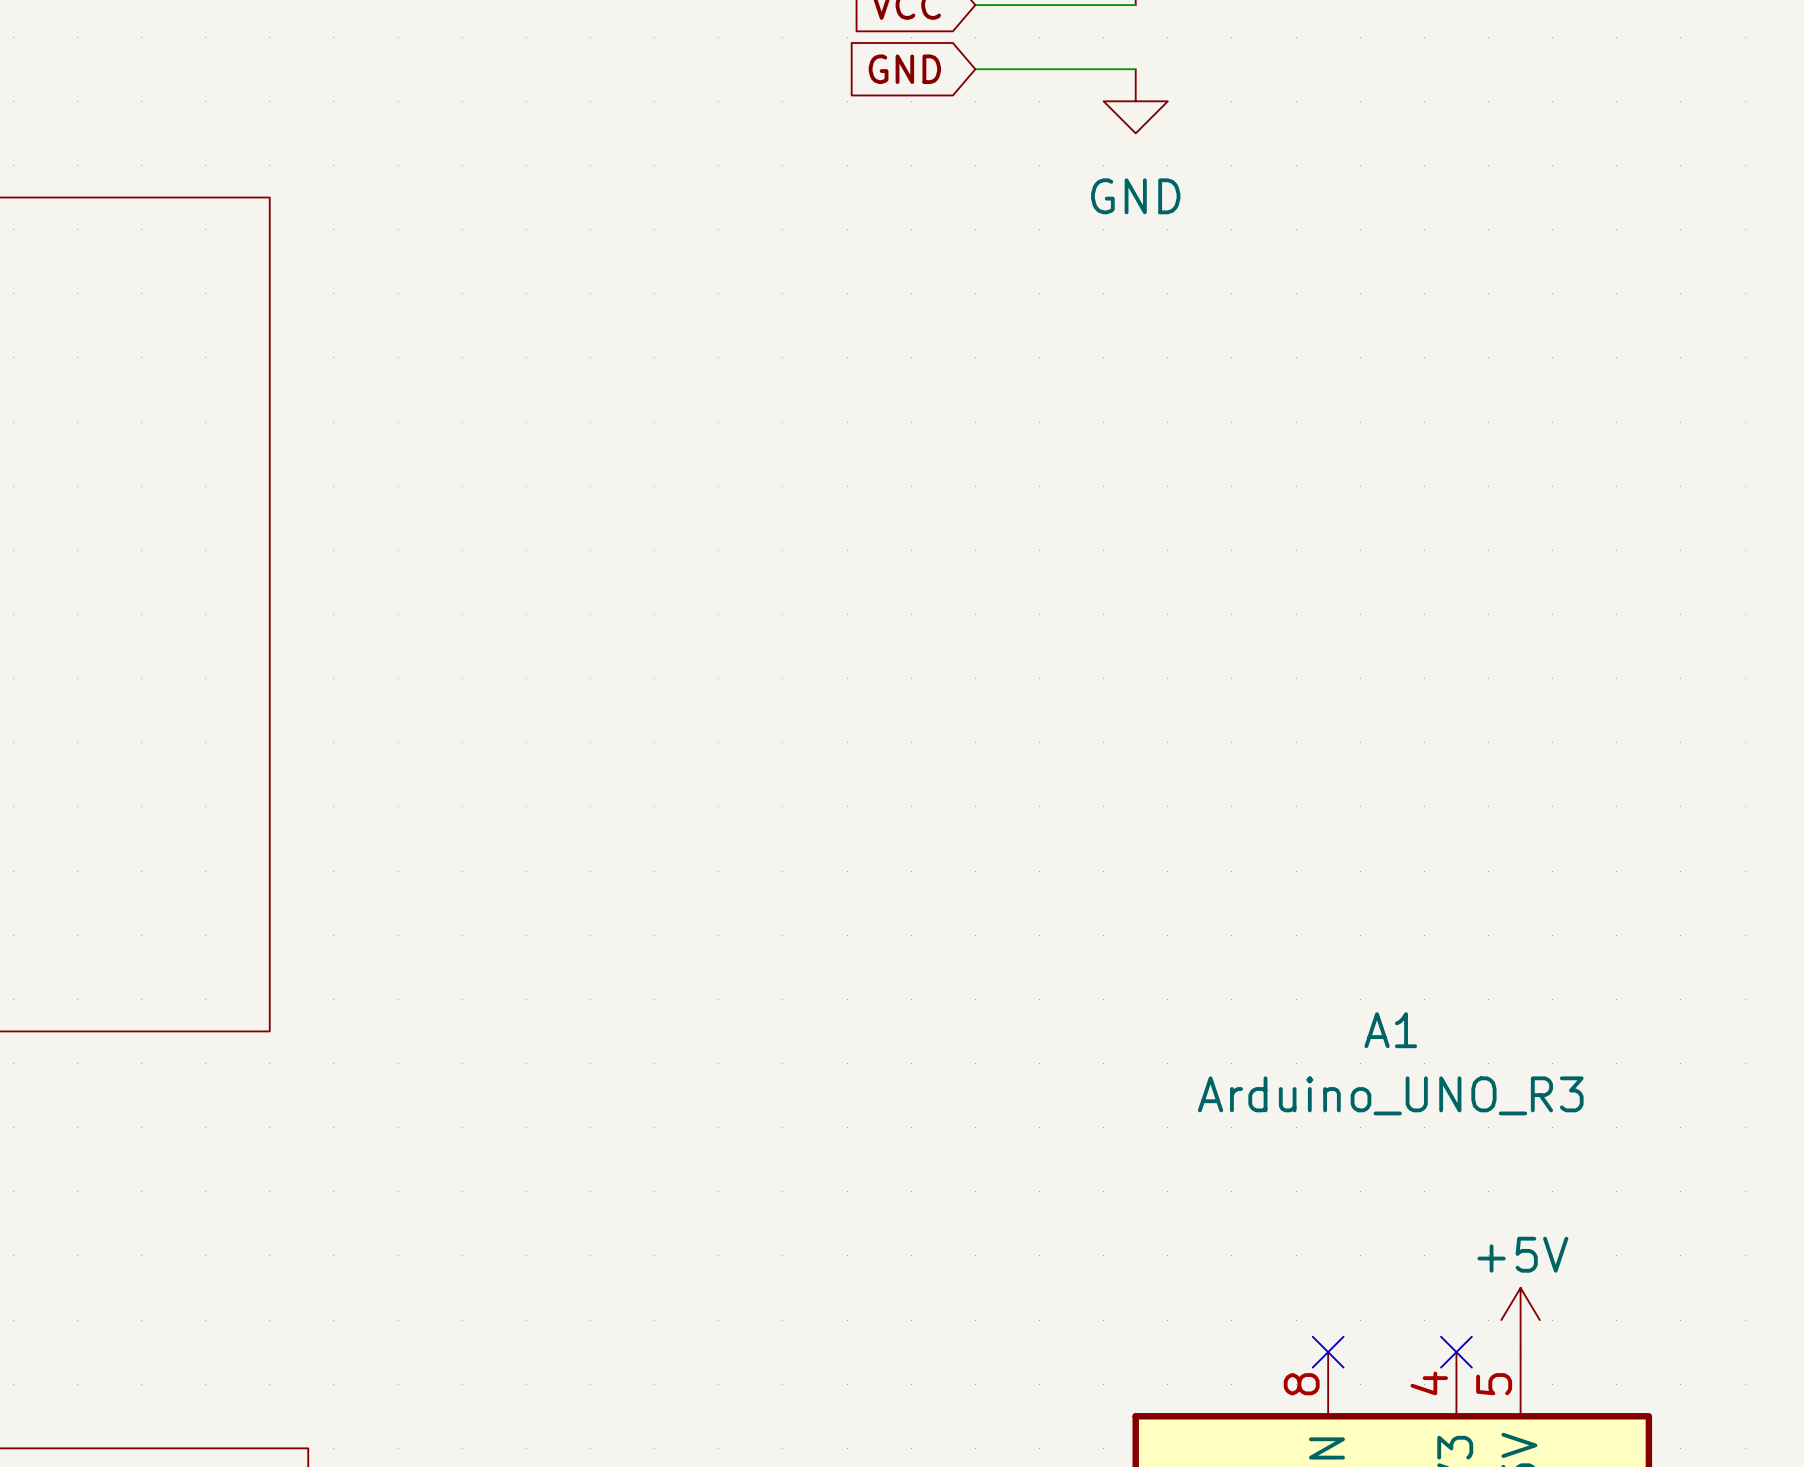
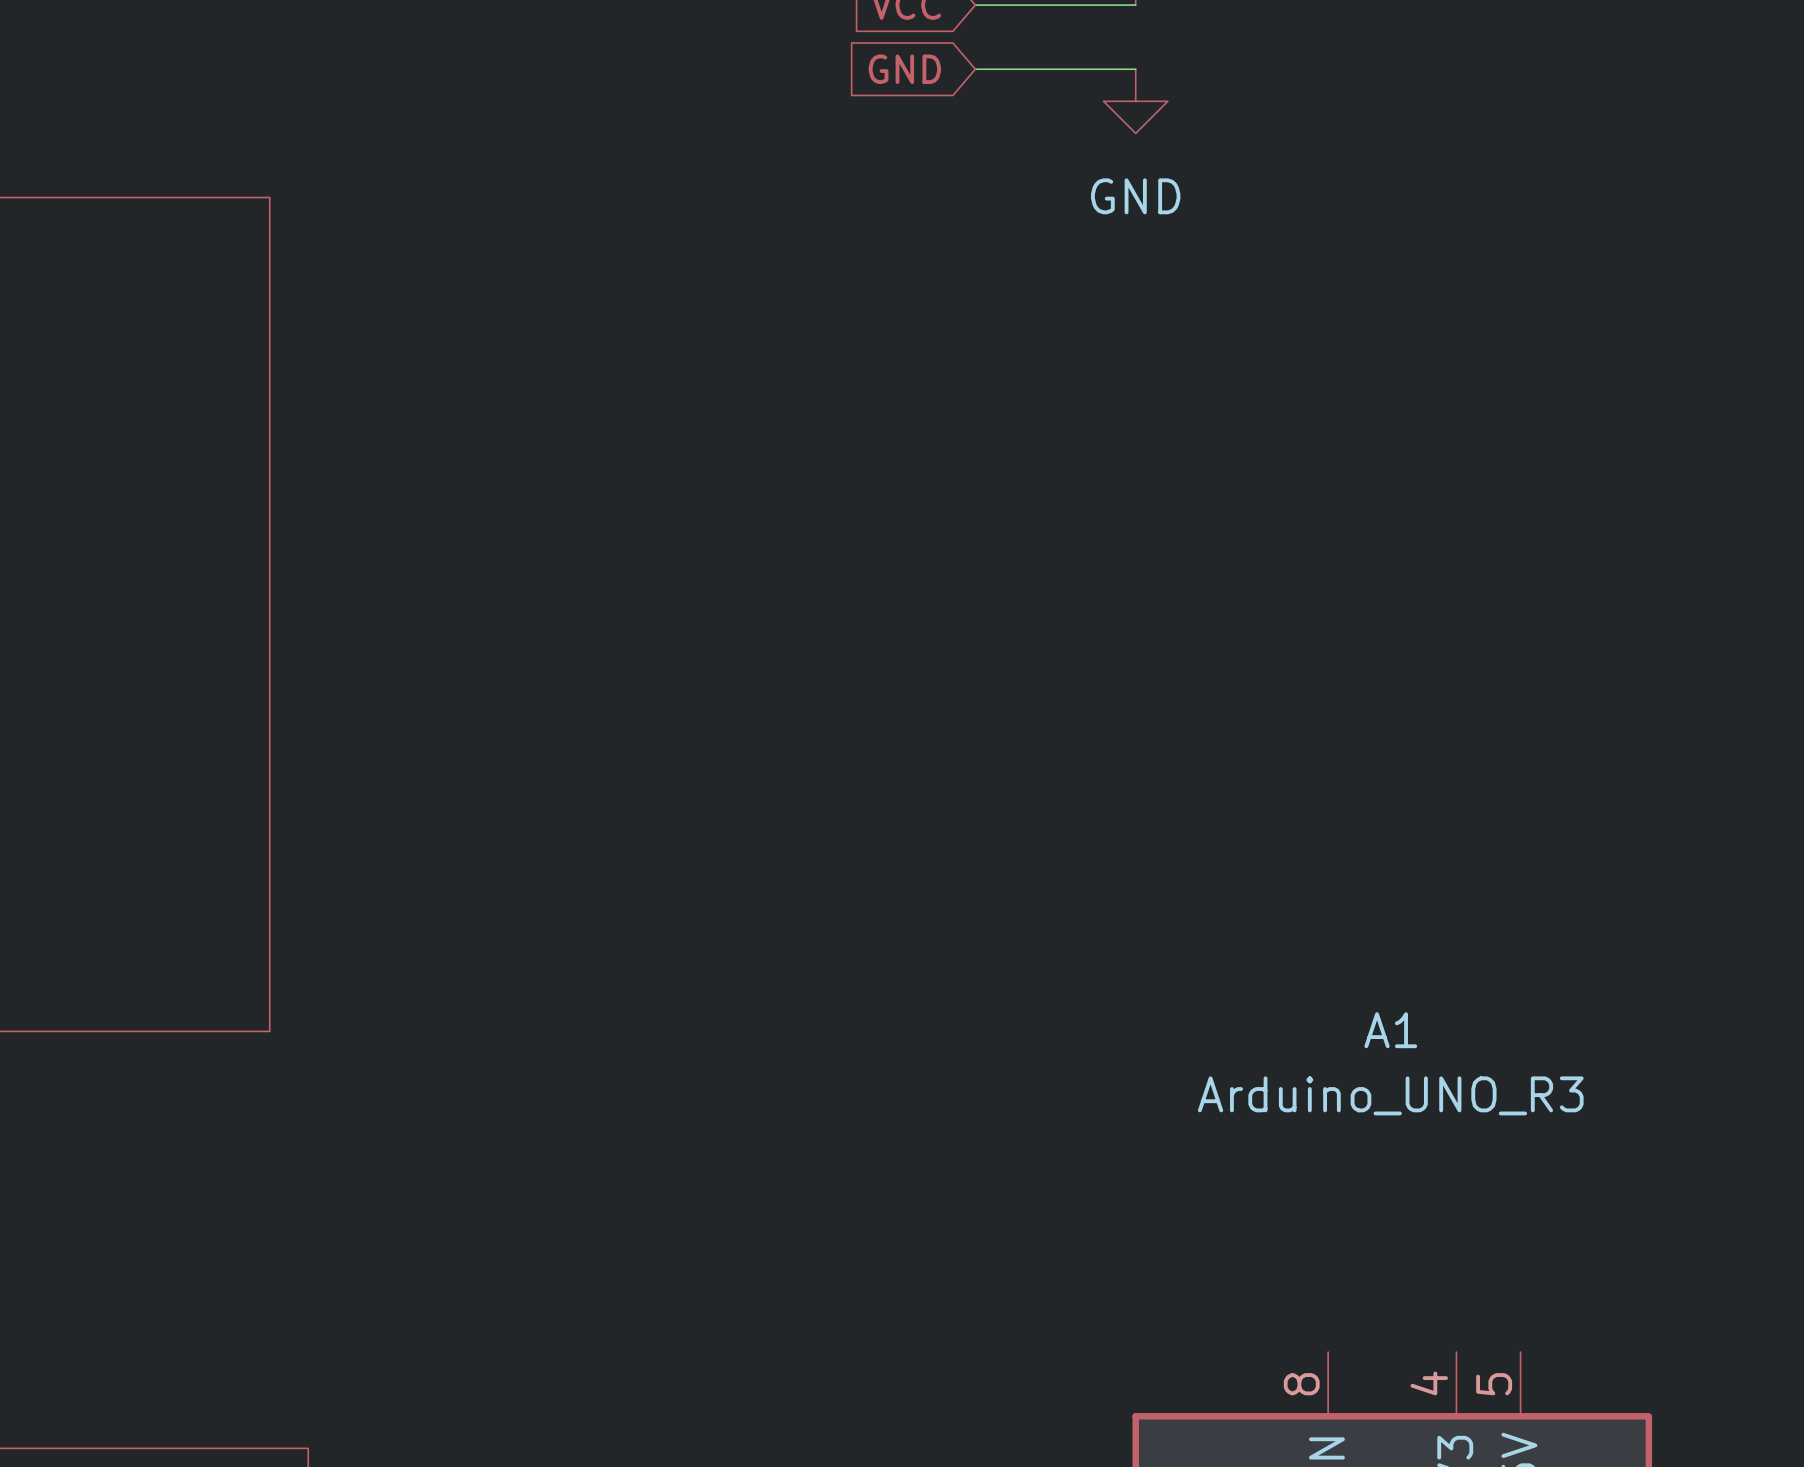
power symbol: +5V (1520, 1320) -> none
no-connect mark: (1328, 1352) -> none
no-connect mark: (1456, 1352) -> none

